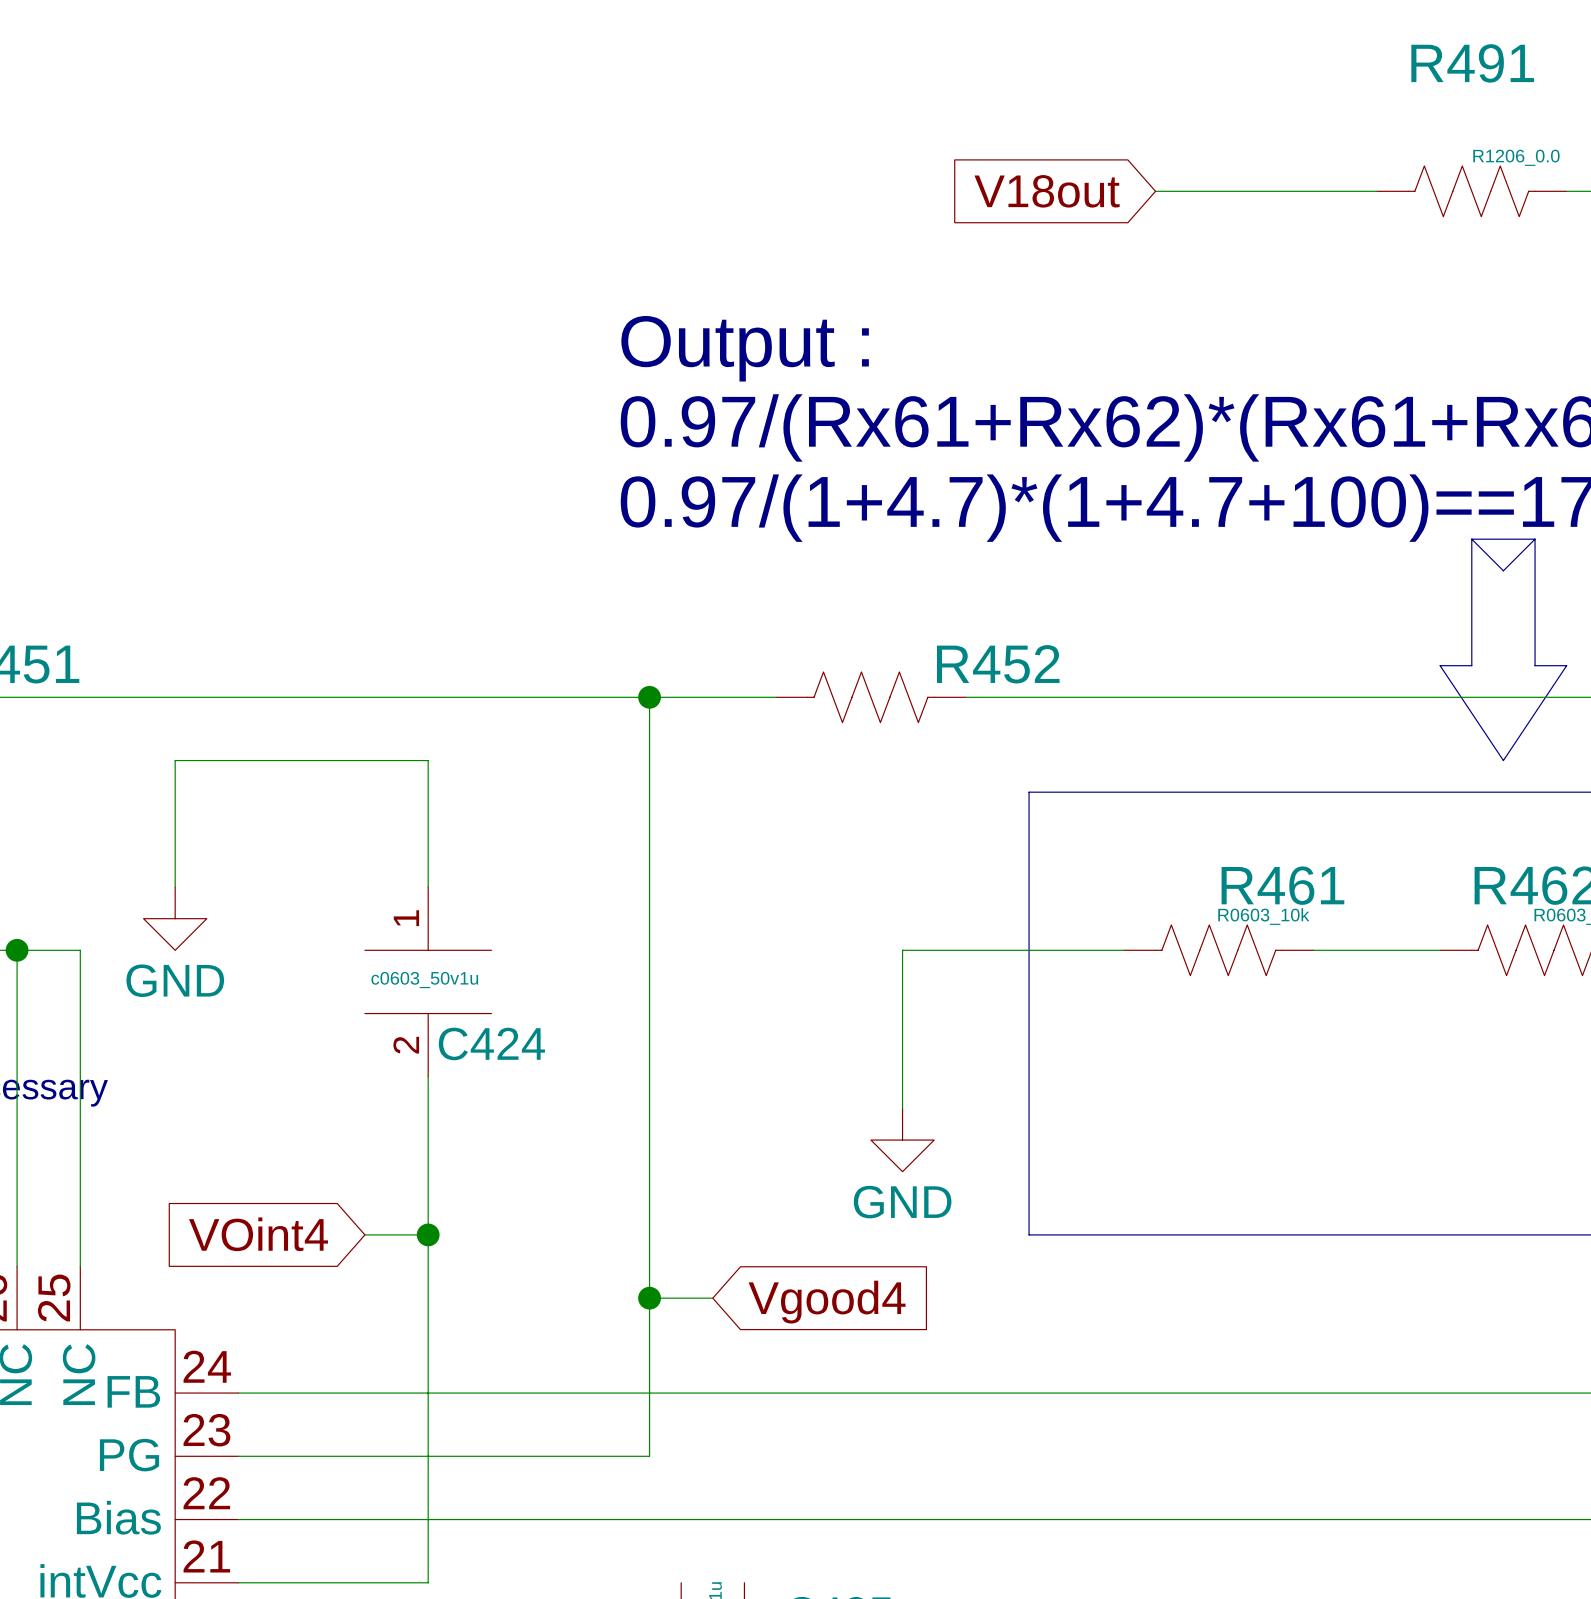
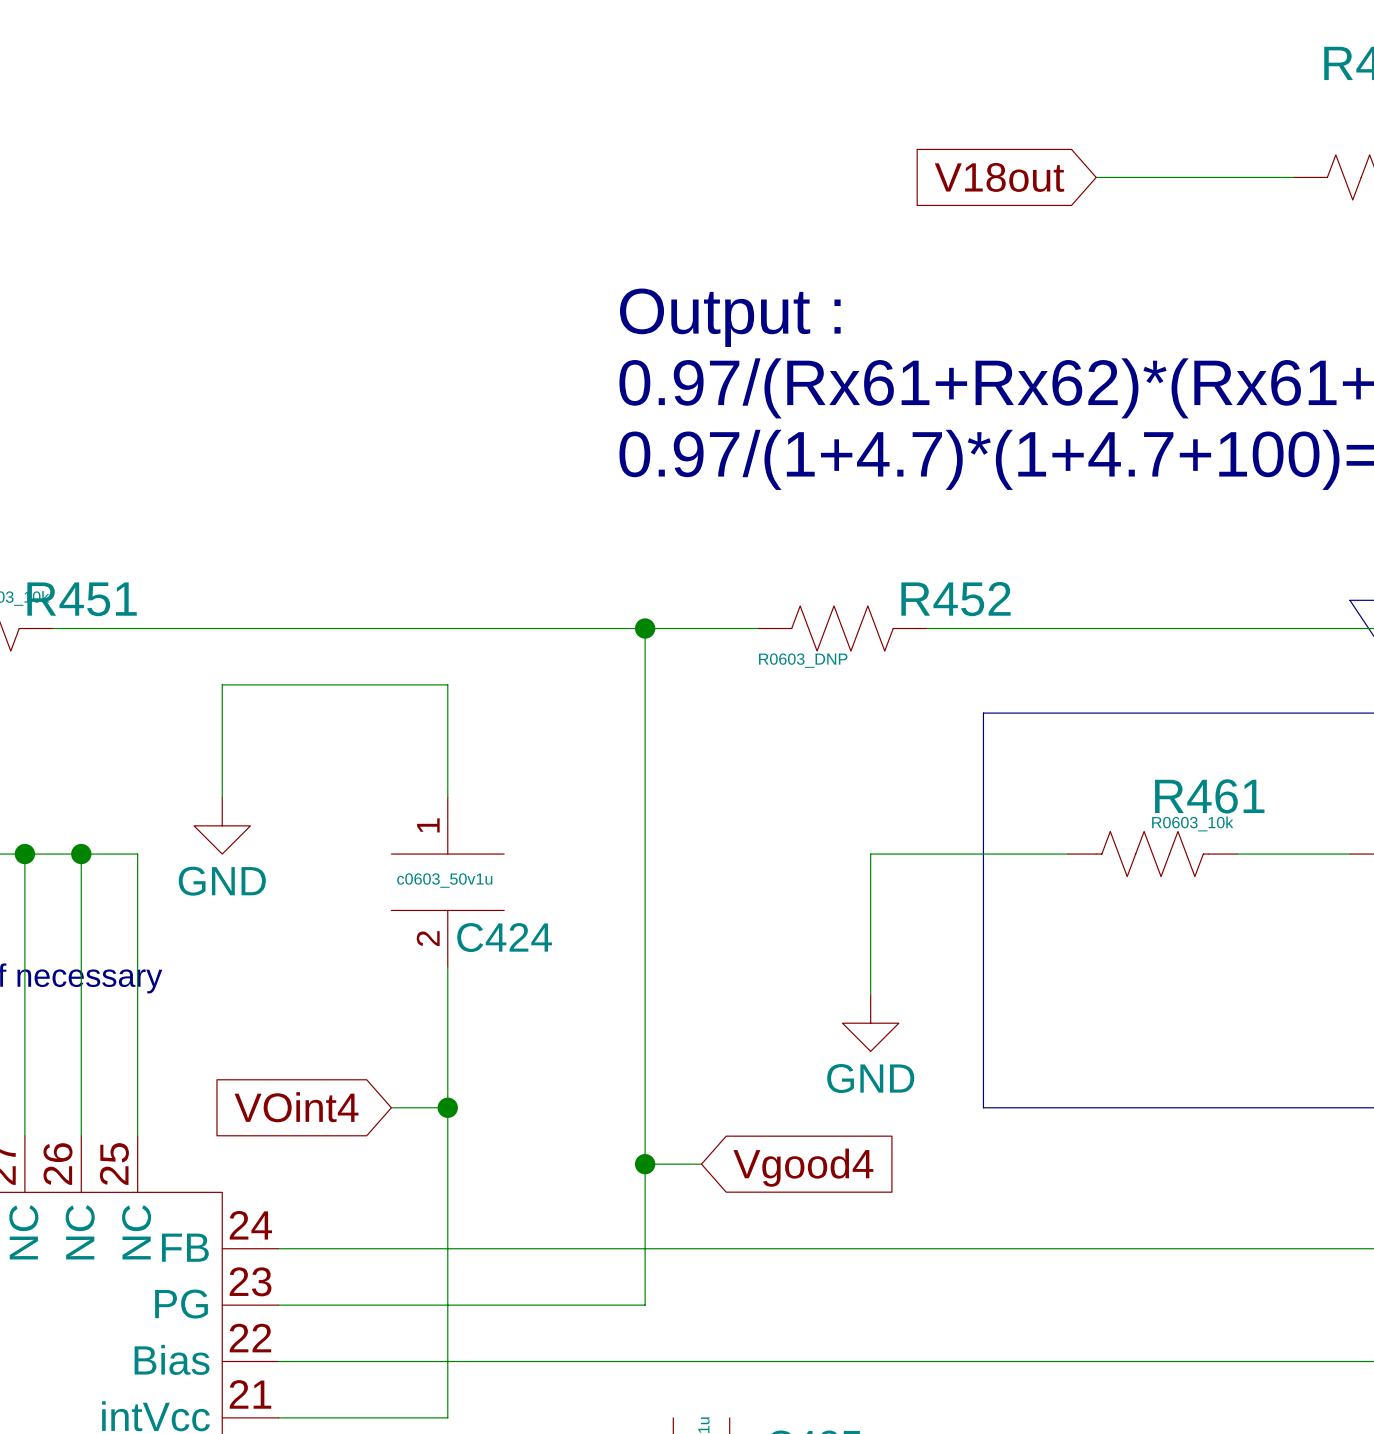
R452 value: none -> R0603_DNP (803, 660)

